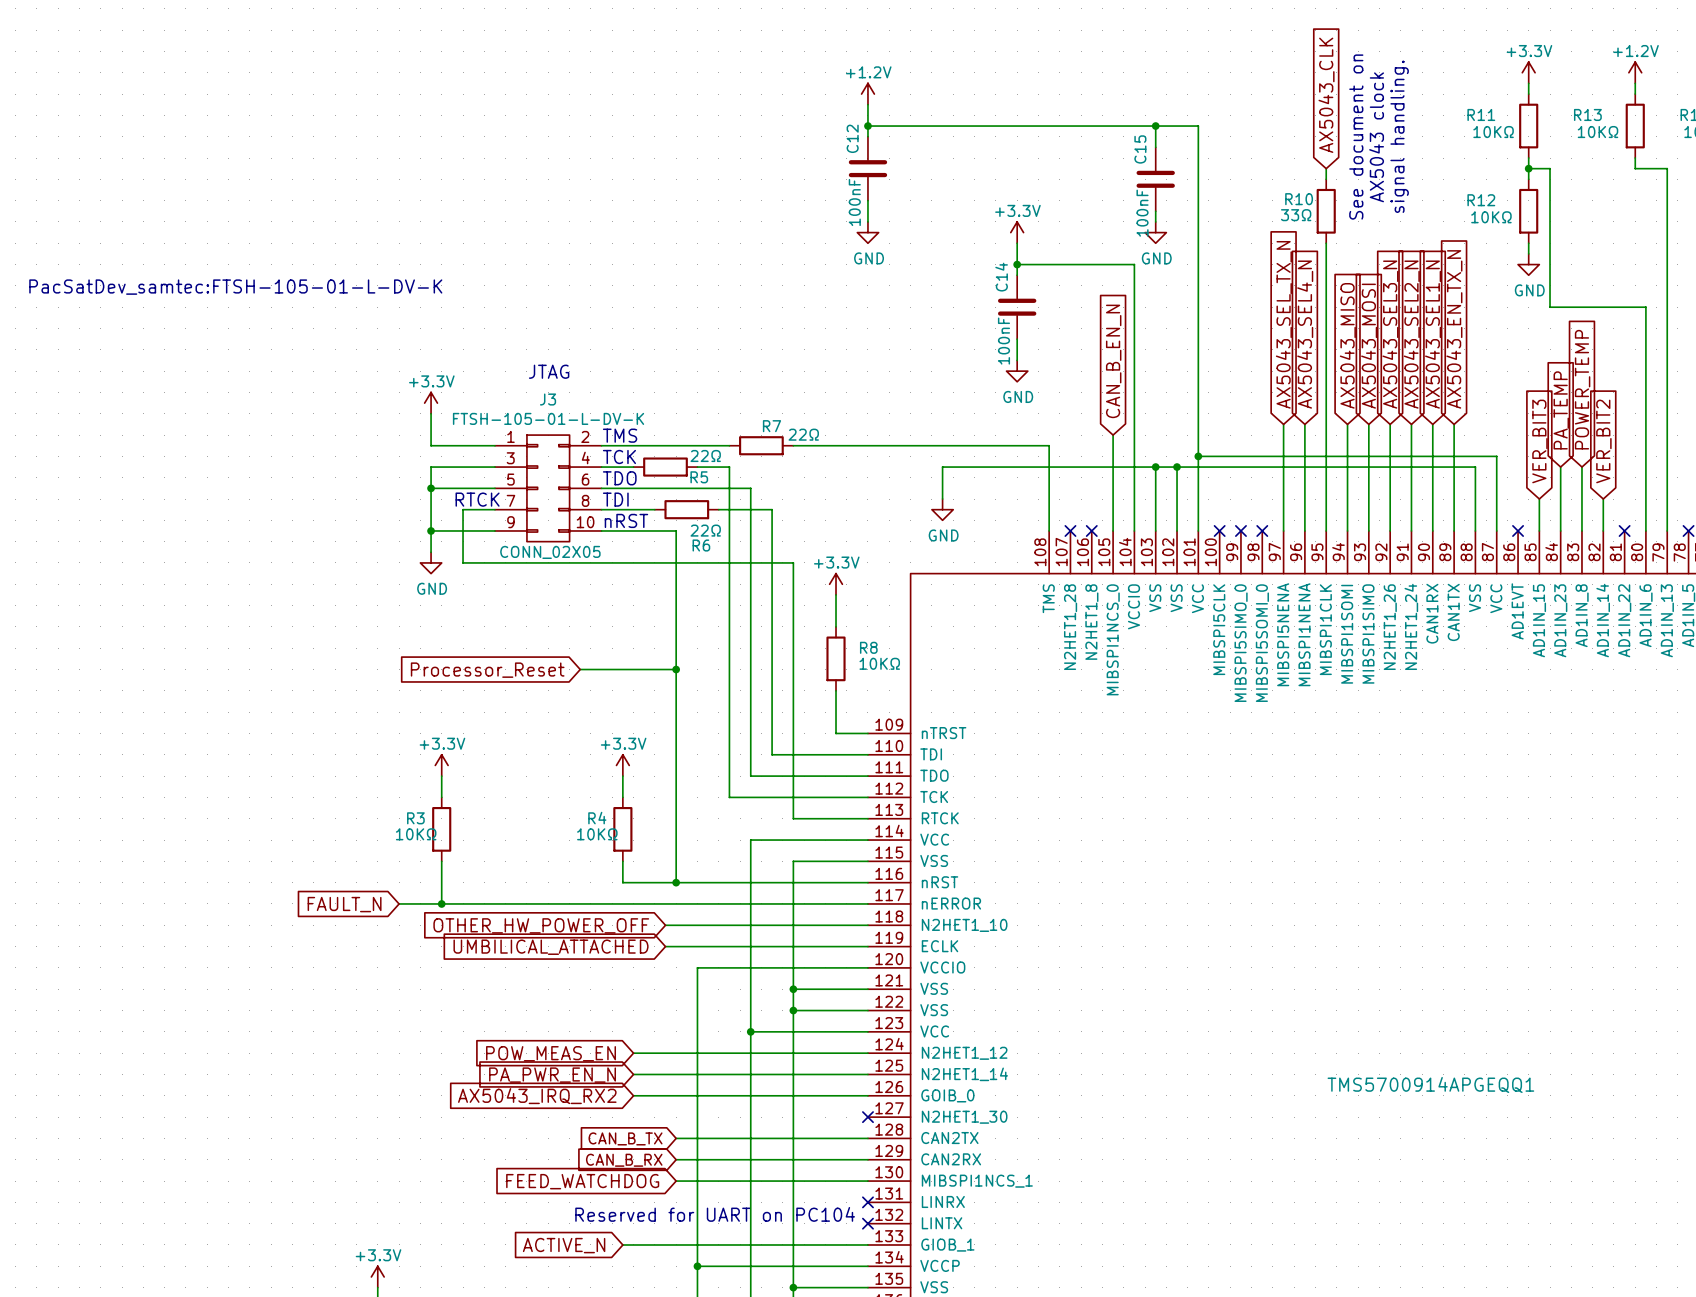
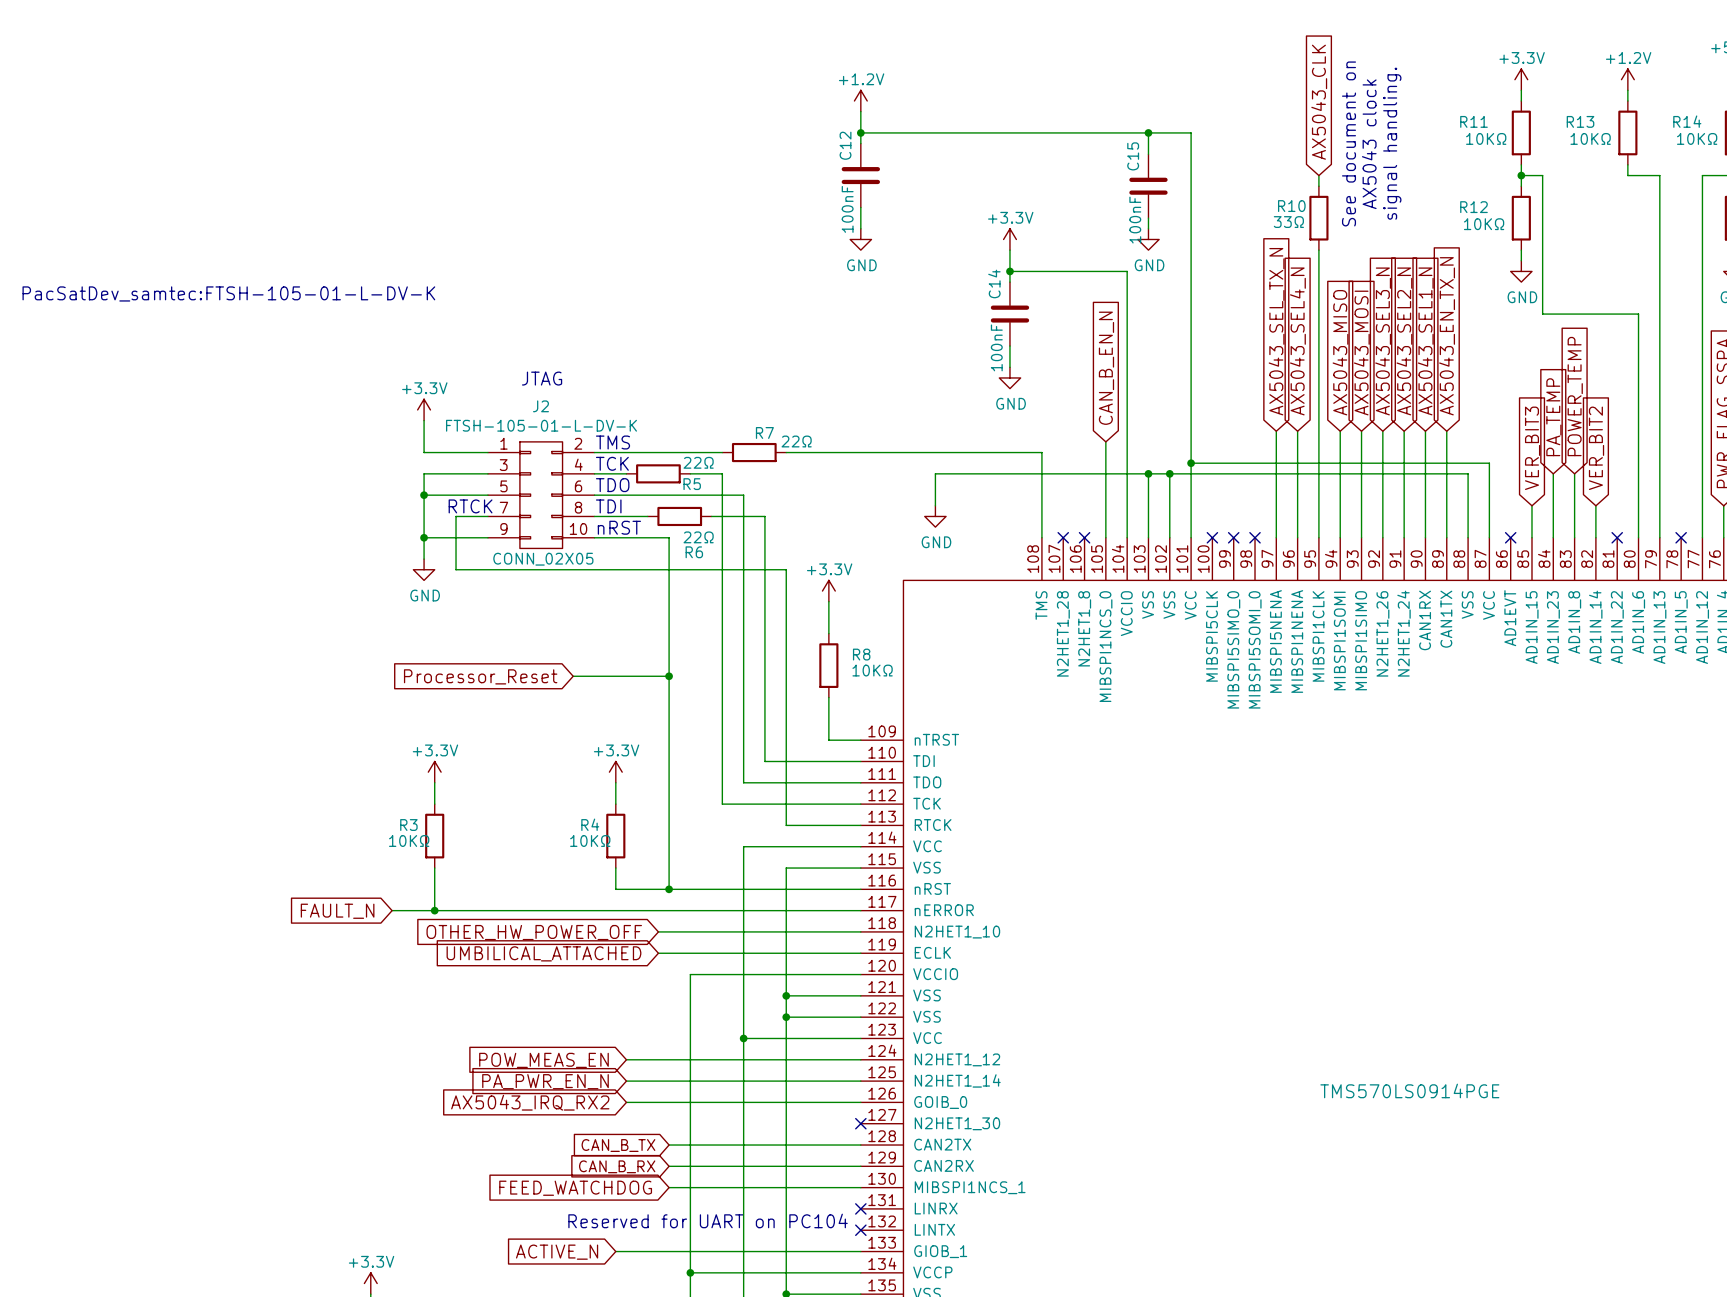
J3 name: J3 (548, 399) -> J2 (540, 406)
part value: TMS5700914APGEQQ1 (1430, 1084) -> TMS570LS0914PGE (1409, 1090)

